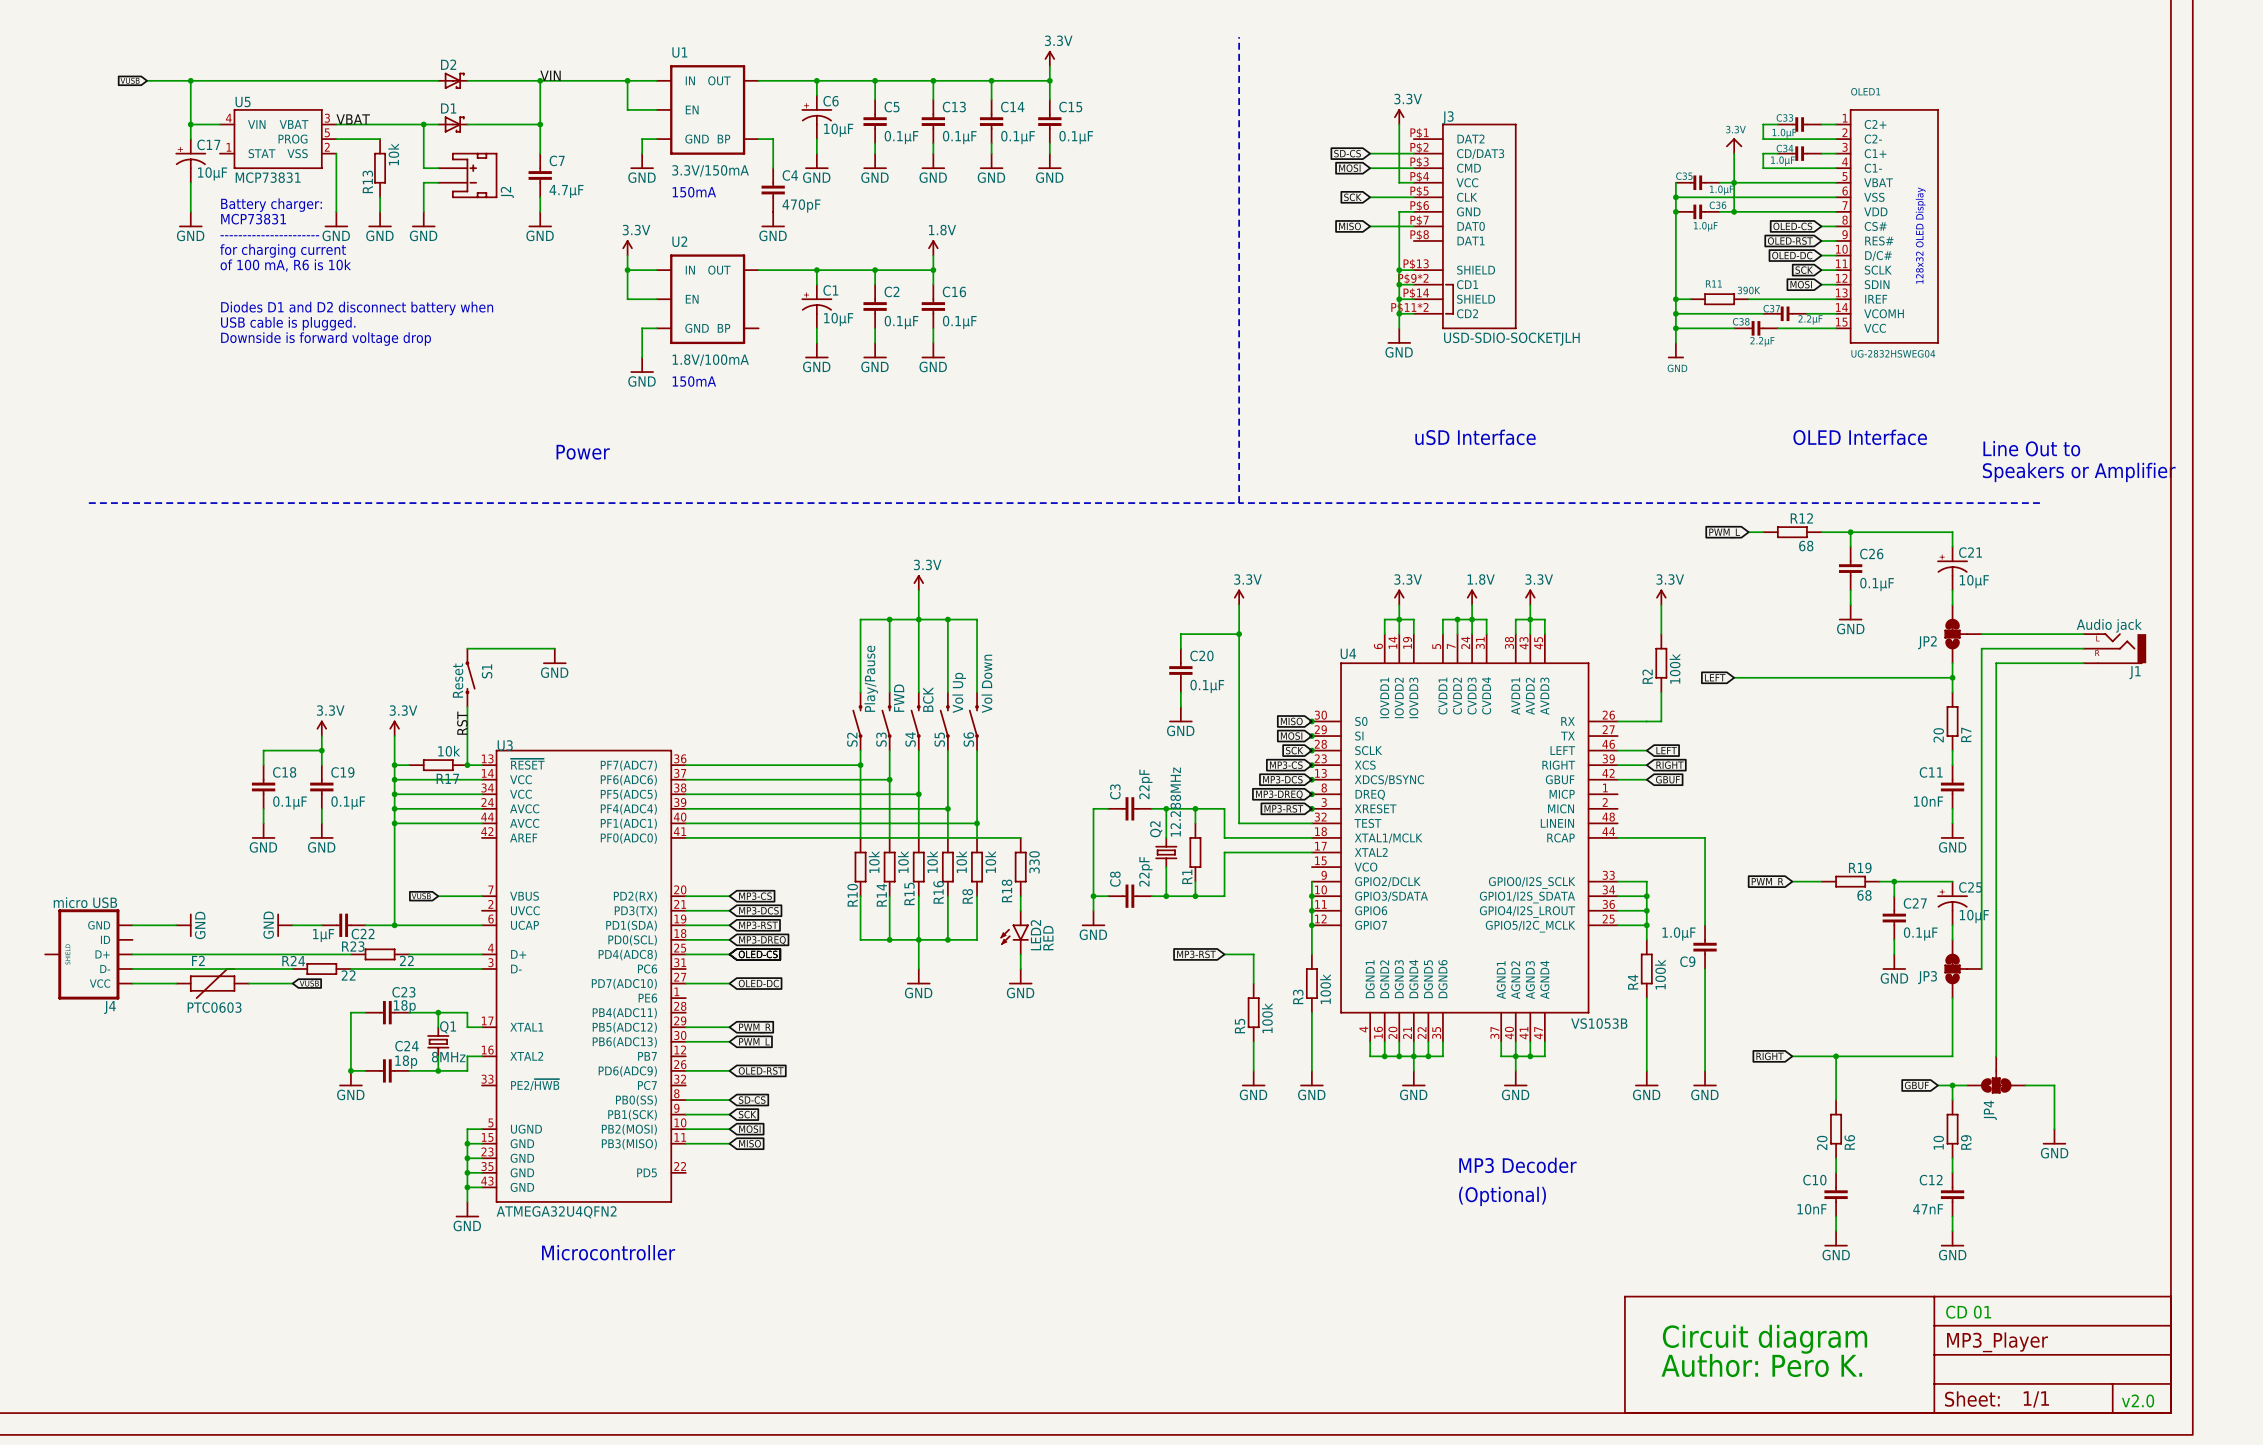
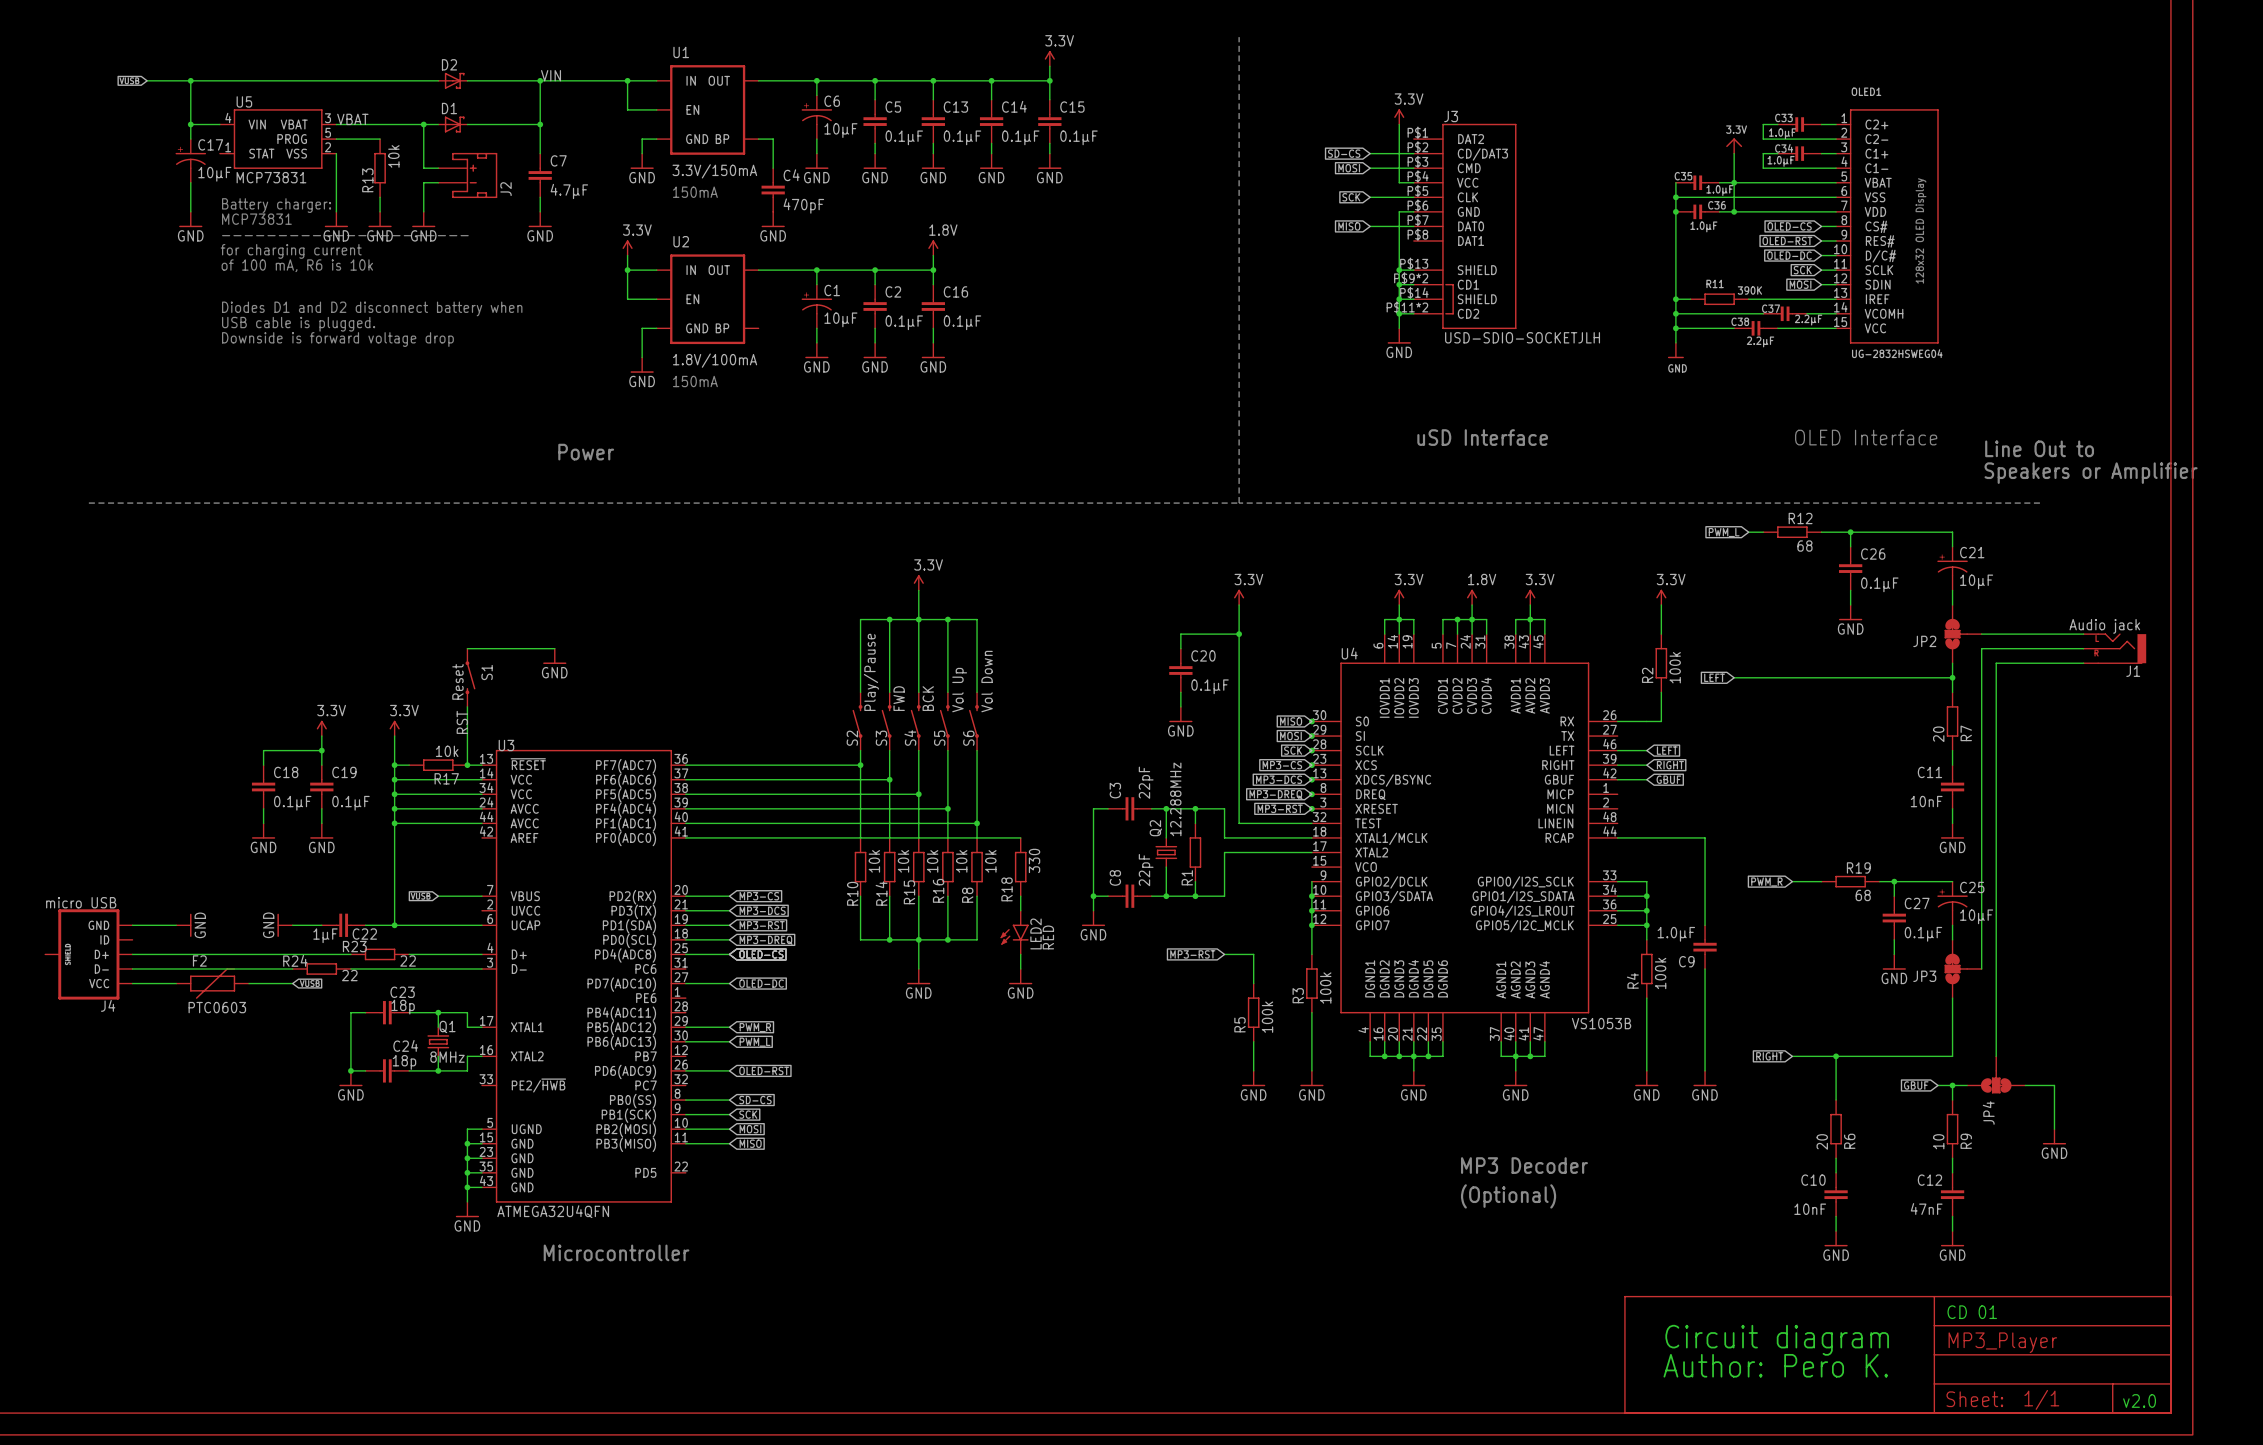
U3 value: ATMEGA32U4QFN2 (556, 1212) -> ATMEGA32U4QFN (553, 1211)

